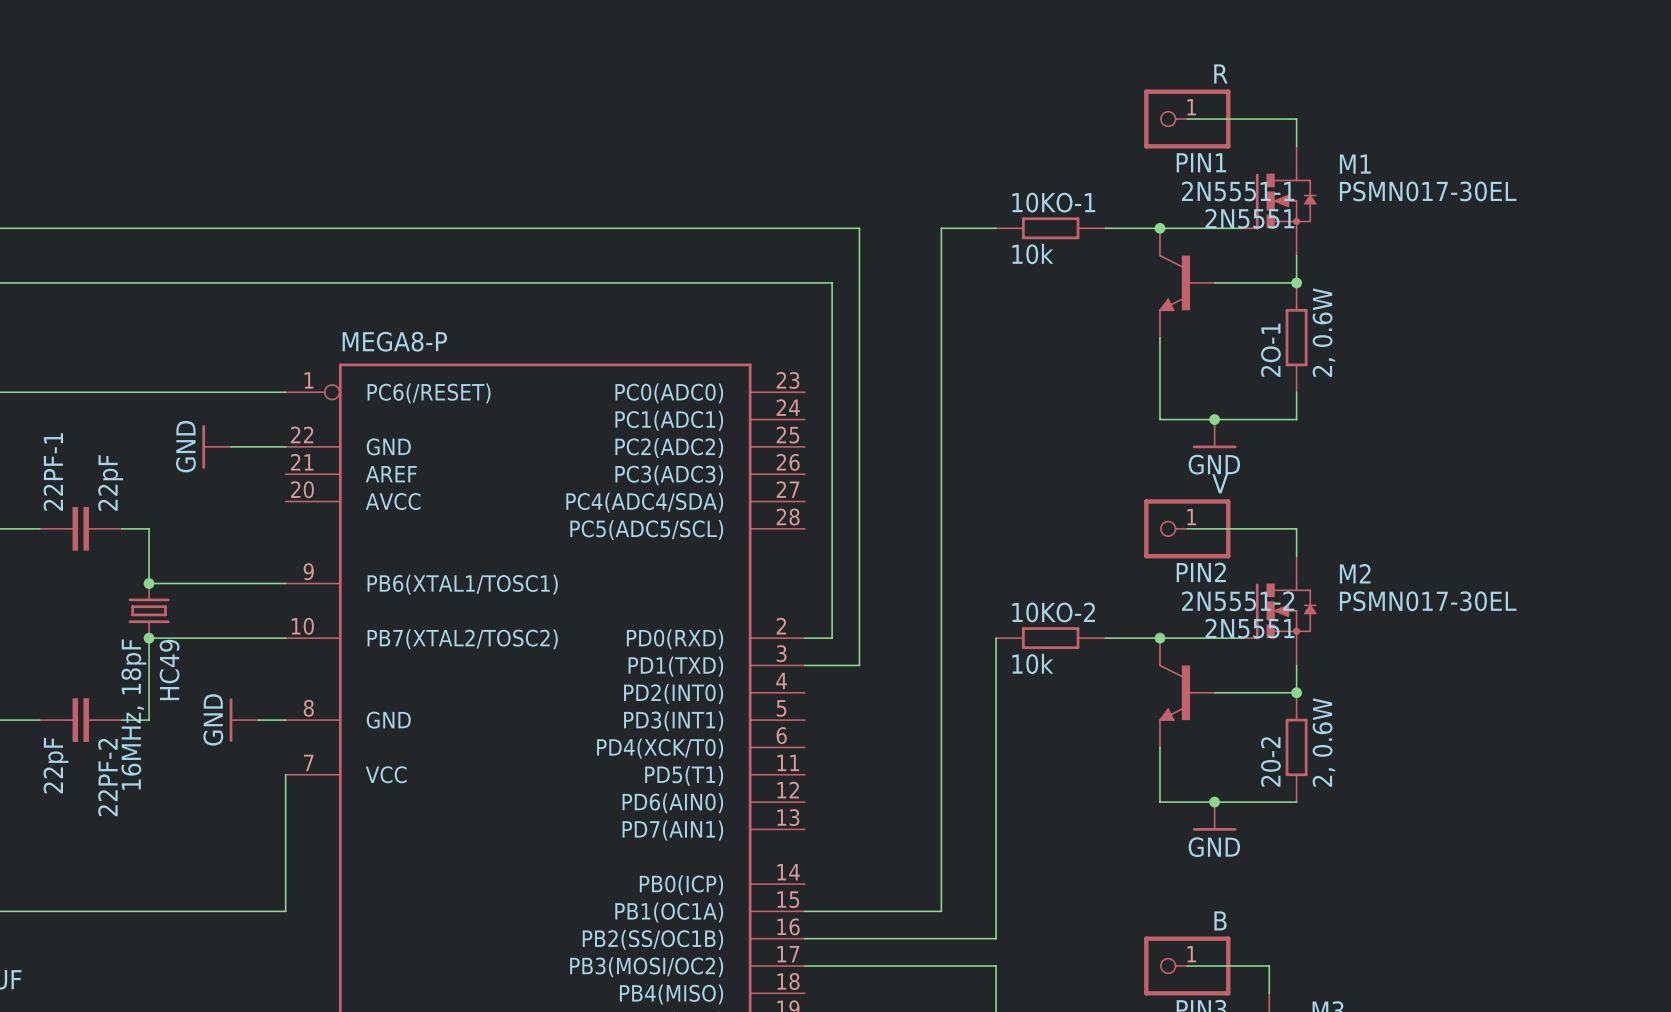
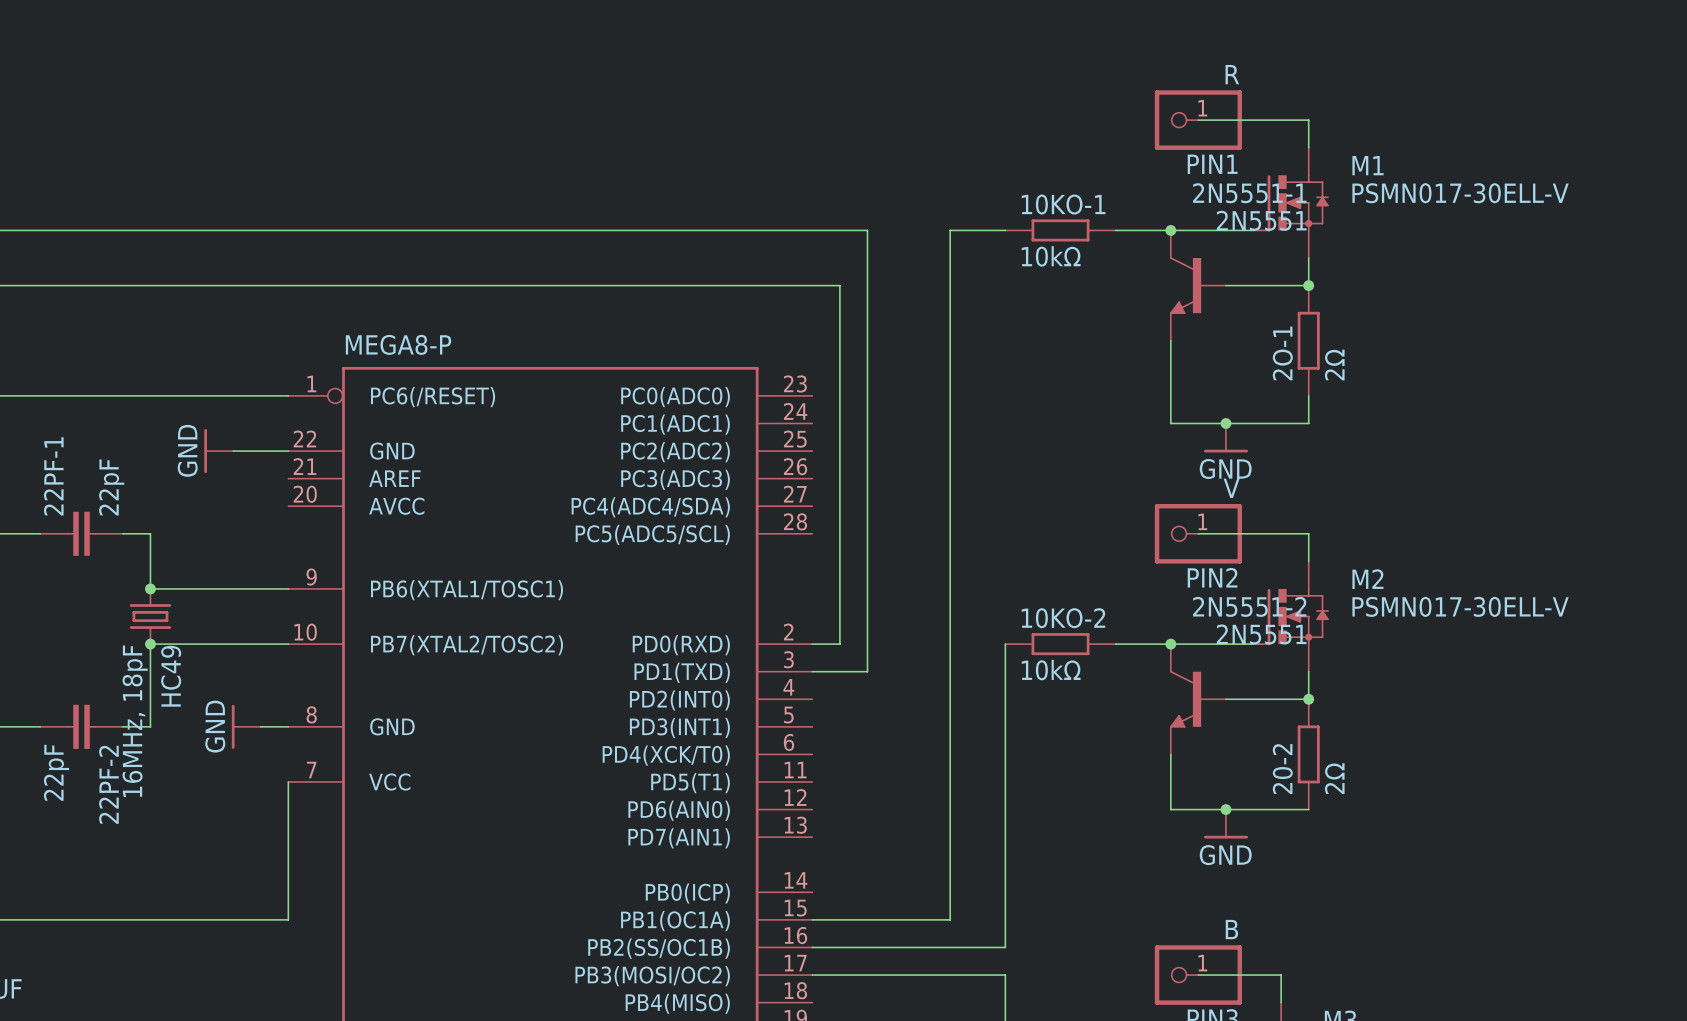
M1 value: PSMN017-30EL (1428, 191) -> PSMN017-30ELL-V (1460, 193)
10KO-1 value: 10k (1032, 254) -> 10kΩ (1051, 256)
2O-1 value: 2, 0.6W (1323, 332) -> 2Ω (1334, 365)
M2 value: PSMN017-30EL (1428, 601) -> PSMN017-30ELL-V (1460, 606)
10KO-2 value: 10k (1032, 663) -> 10kΩ (1051, 670)
20-2 value: 2, 0.6W (1323, 742) -> 2Ω (1334, 778)

